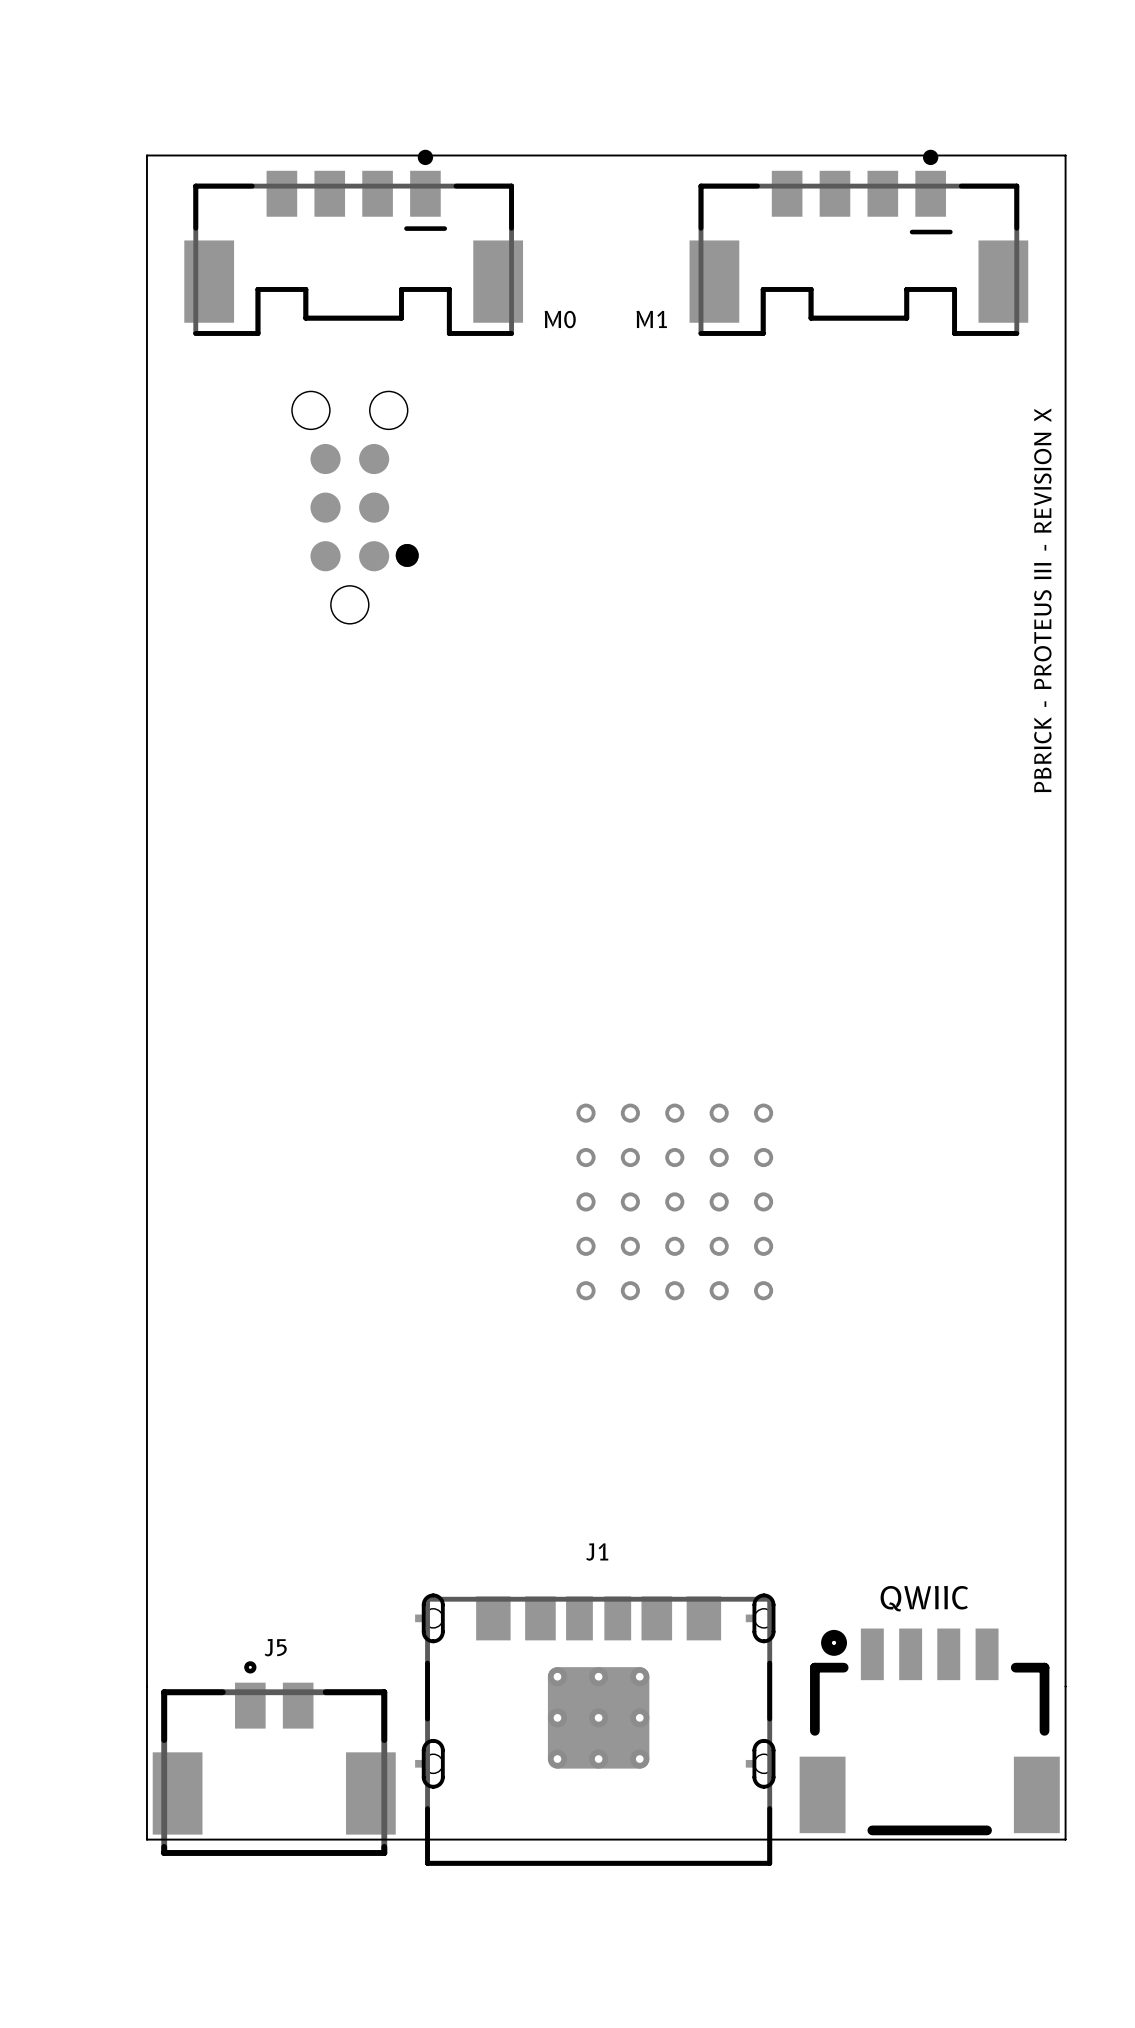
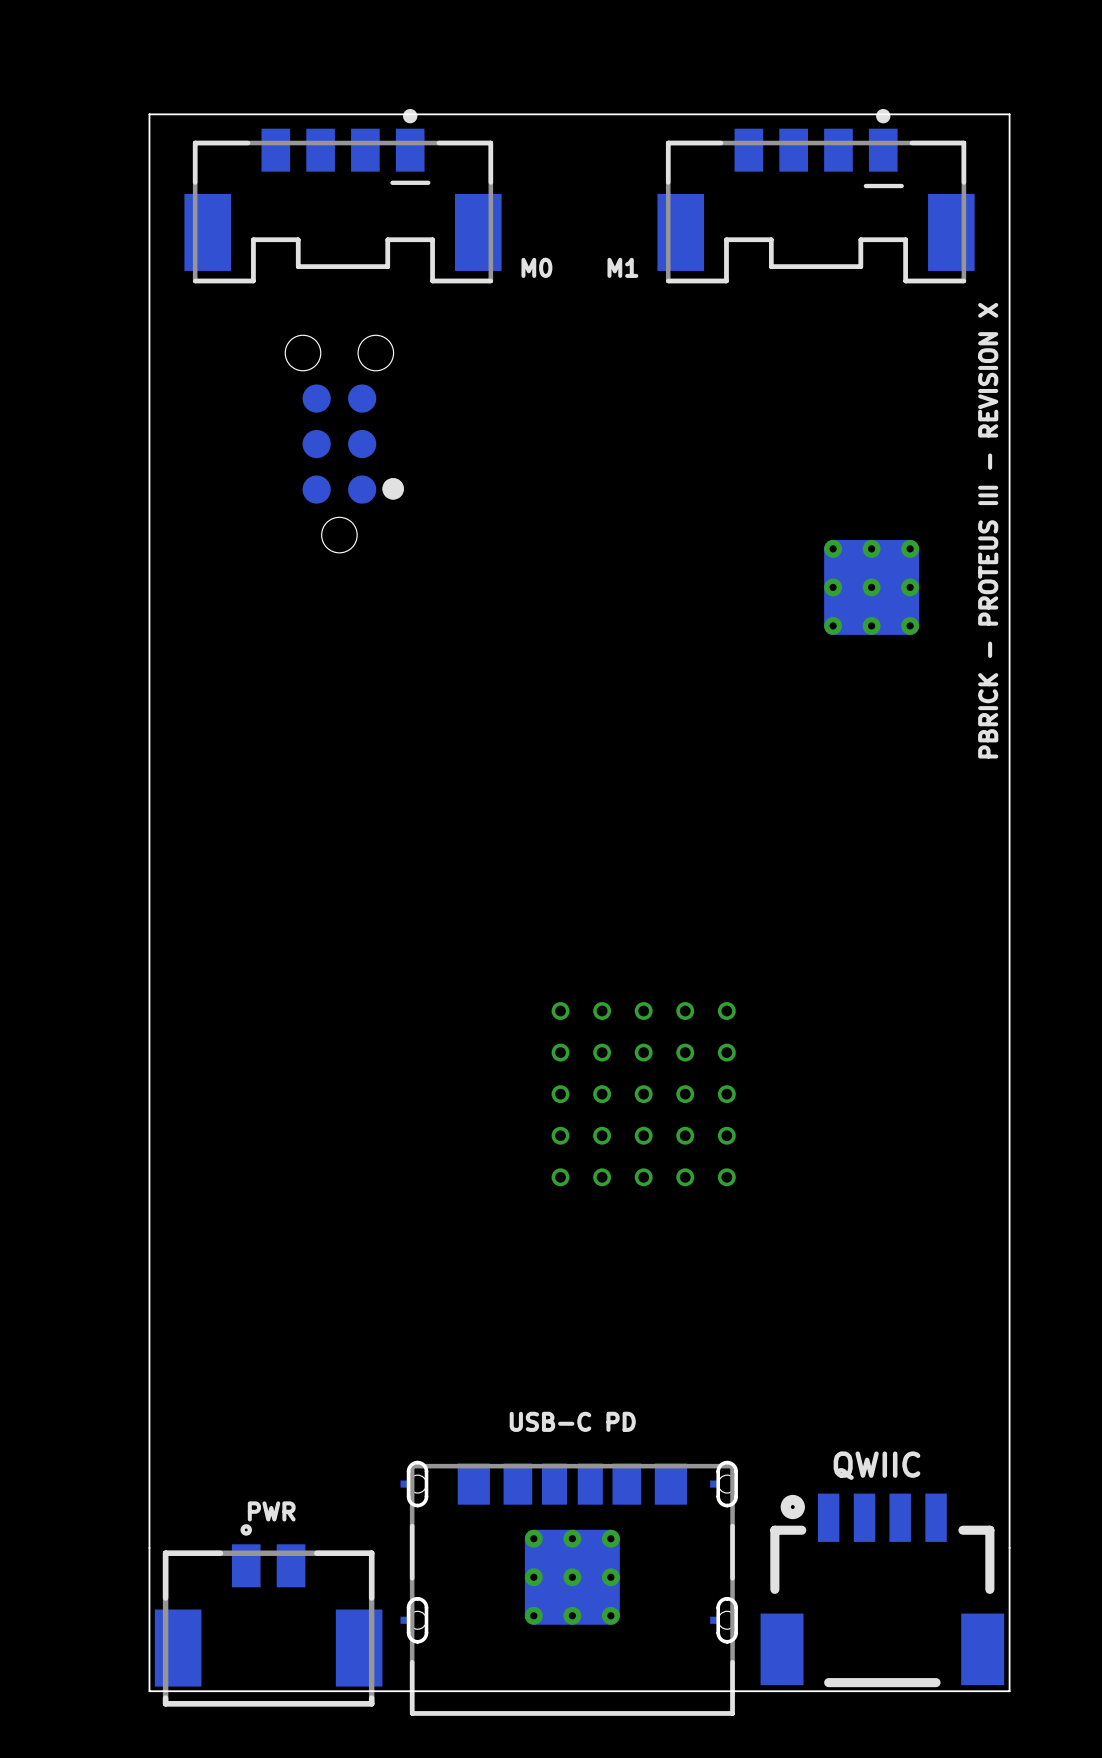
part: none -> (871, 587)
J1 name: J1 (597, 1551) -> USB-C PD (572, 1421)
J5 name: J5 (275, 1647) -> PWR (271, 1511)

